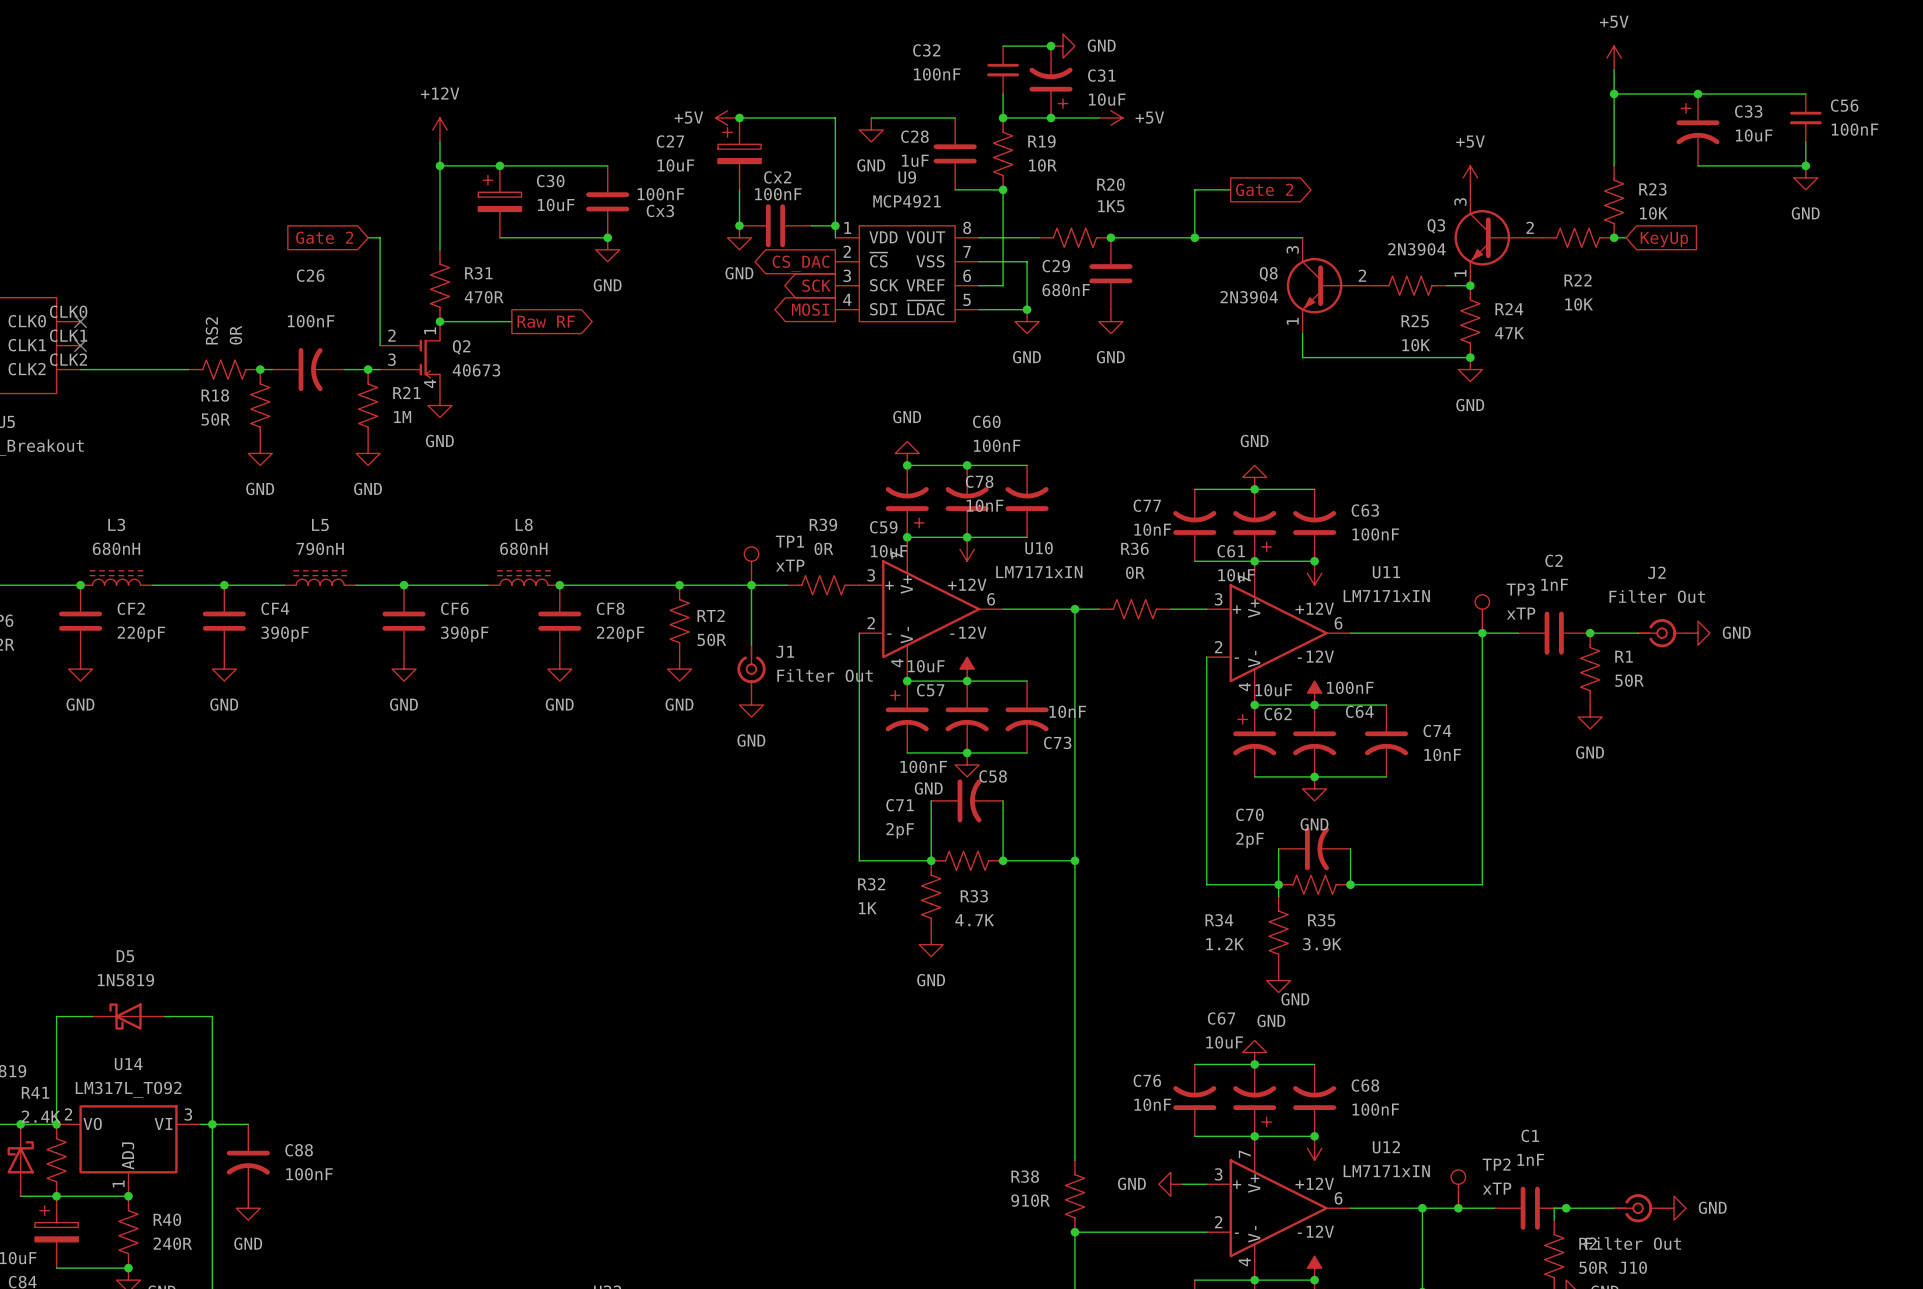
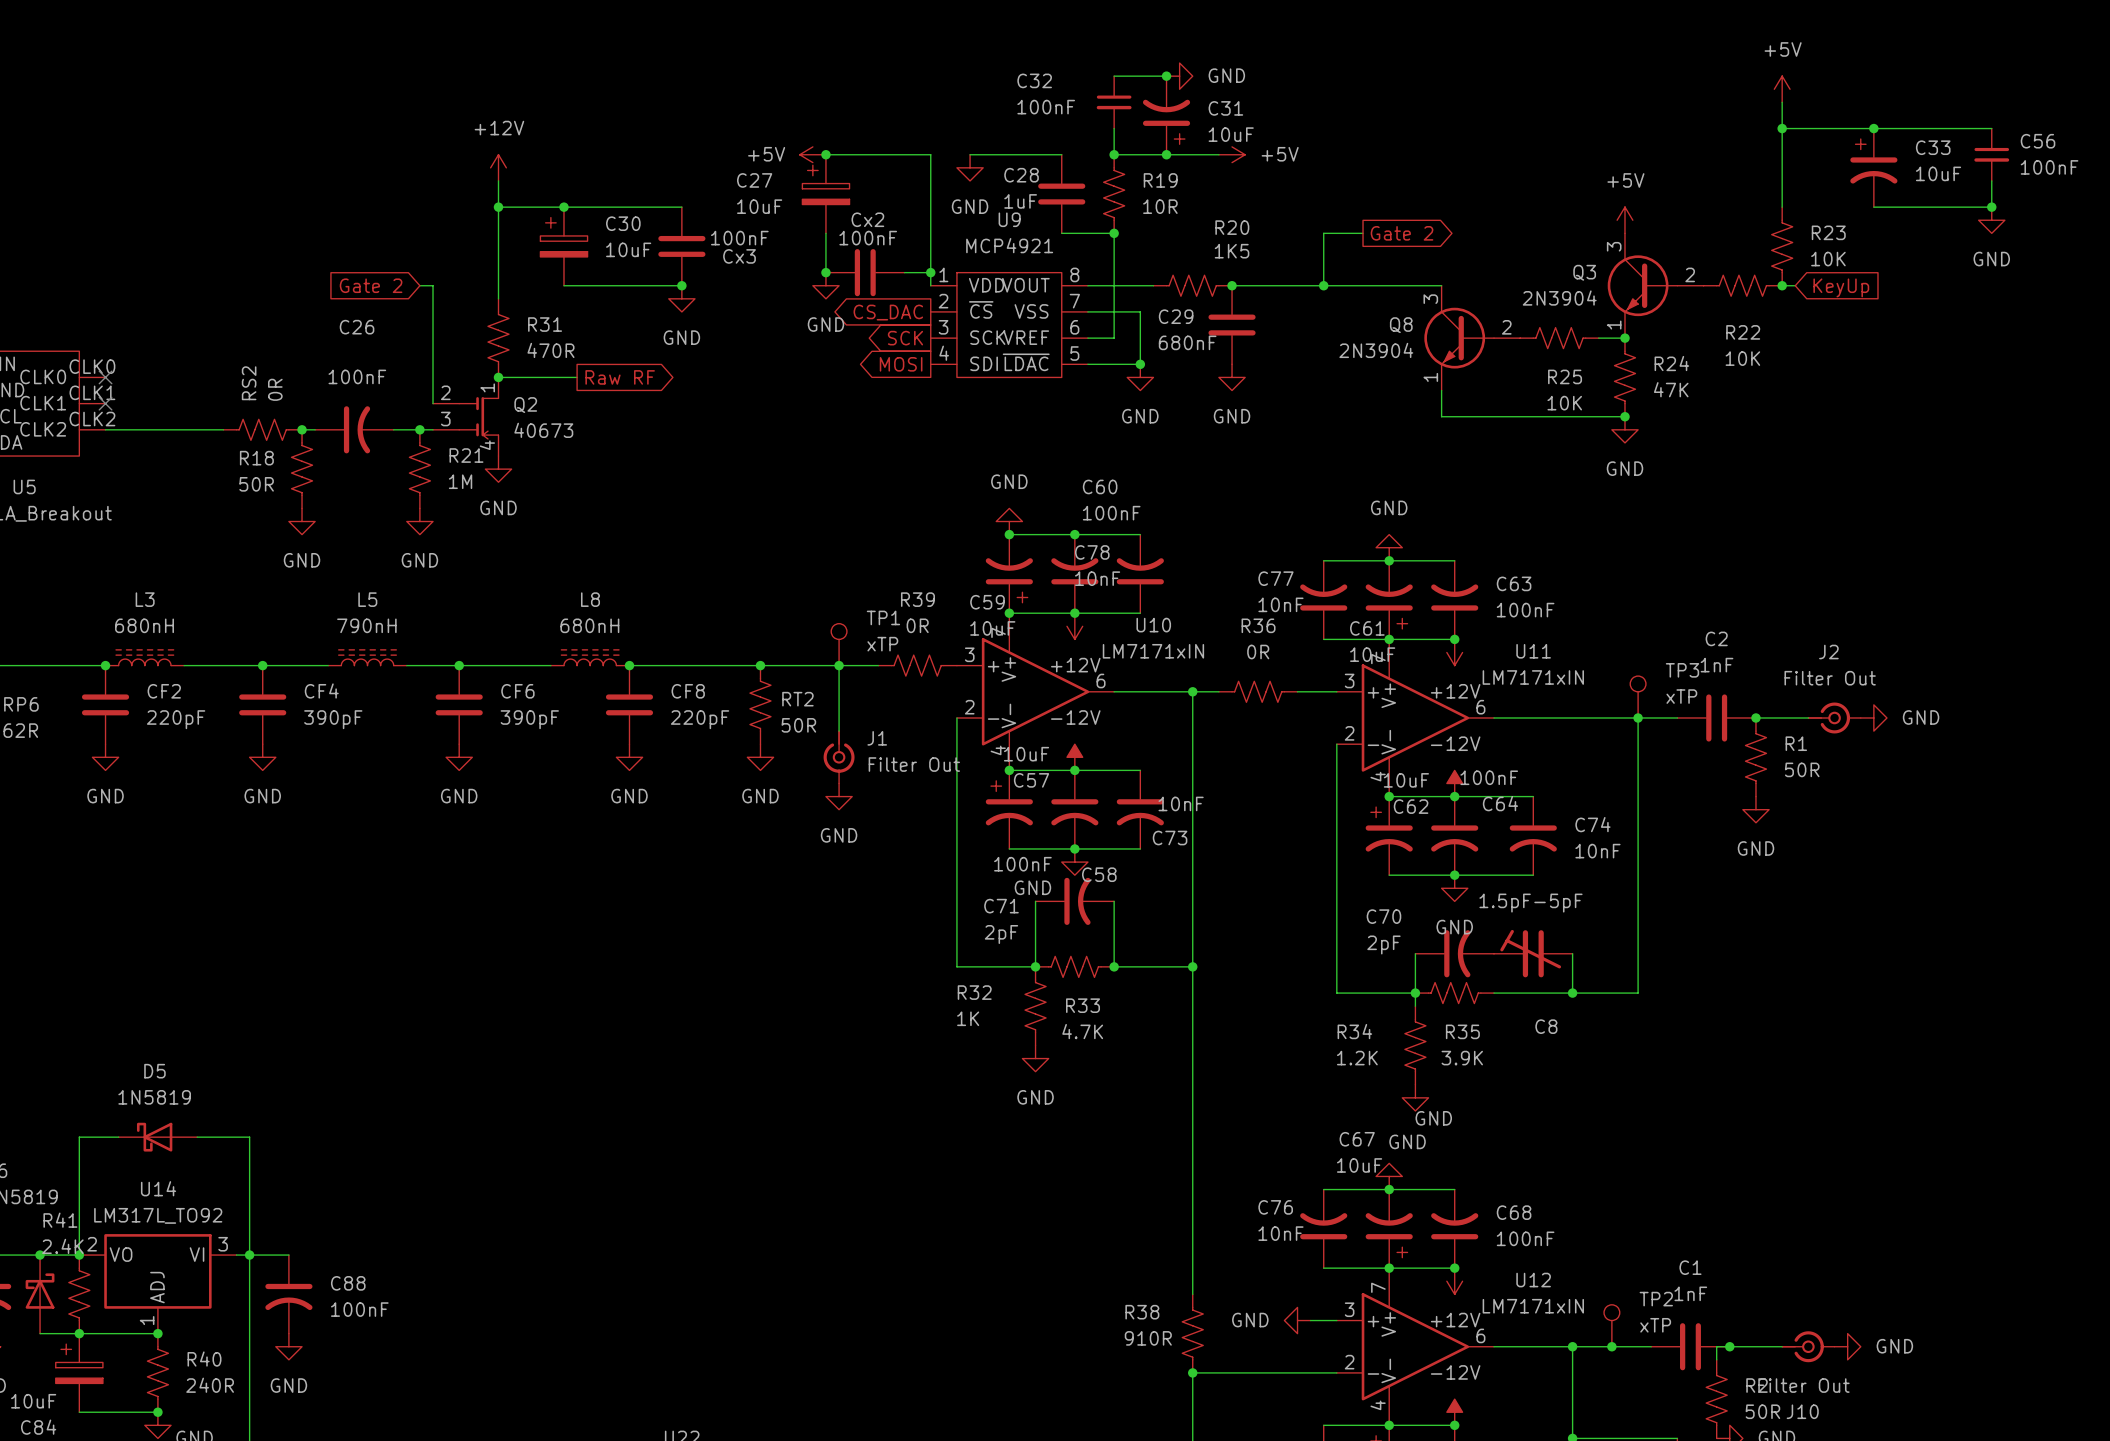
wire: (1350, 848) (1350, 884) -> (1572, 953) (1572, 993)
C8: none -> 1.5pF-5pF (1533, 953)
junction: (1350, 884) -> none
junction: none -> (1572, 993)

